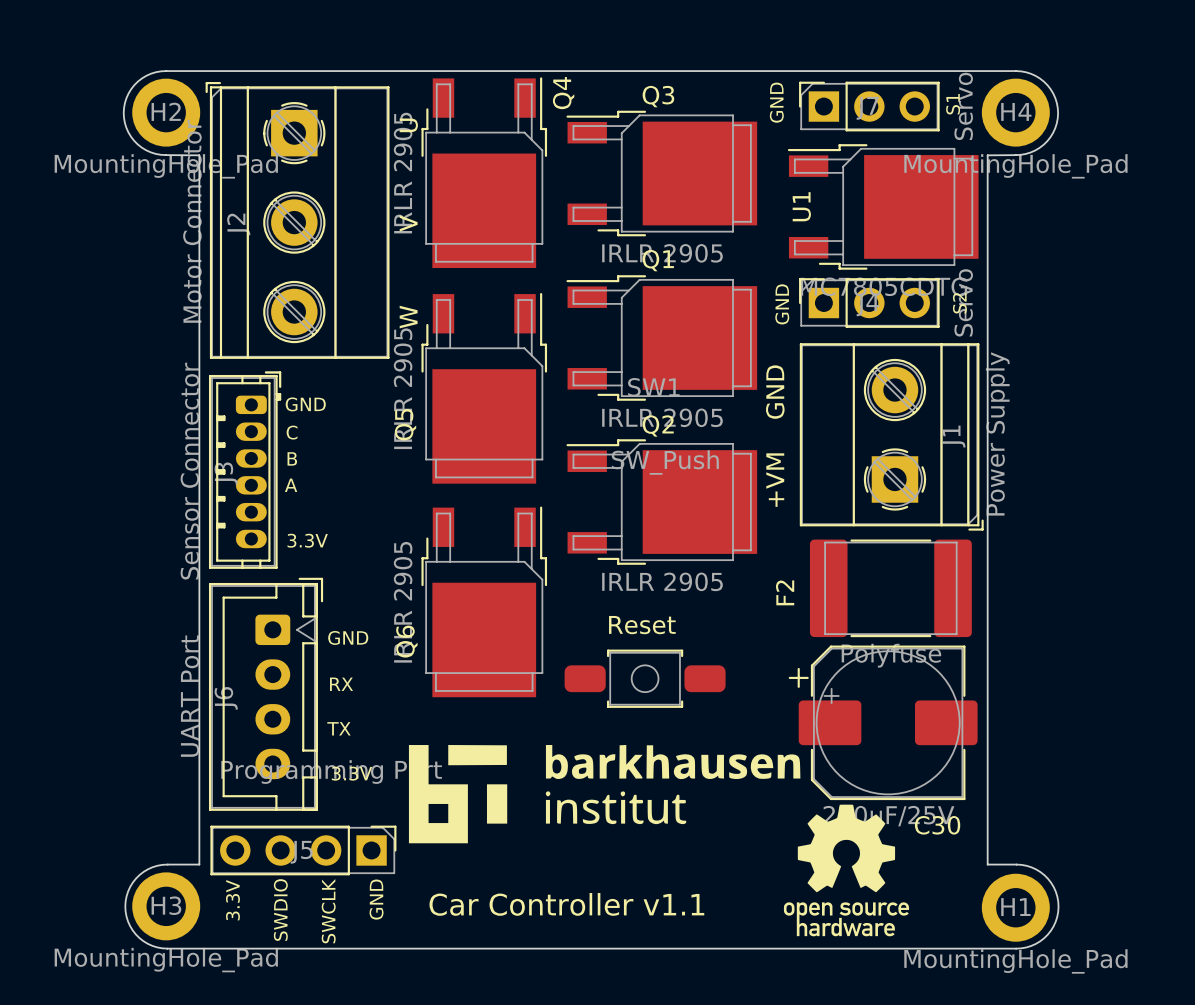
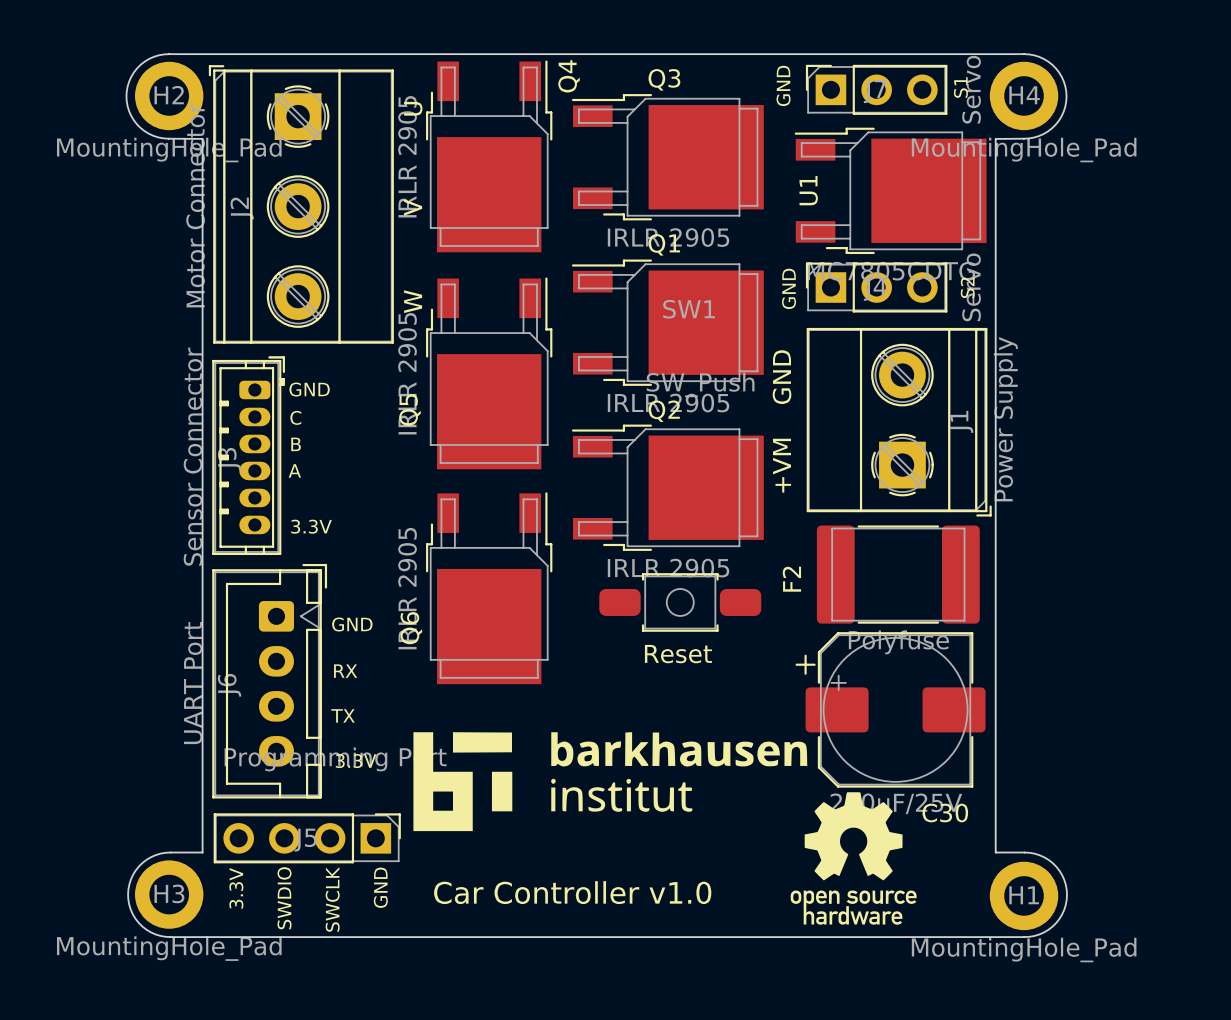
text position: Reset (642, 625) -> Reset (678, 654)
SW1 position: (645, 678) -> (680, 602)
text: Car Controller v1.1 (566, 904) -> Car Controller v1.0 (572, 892)

